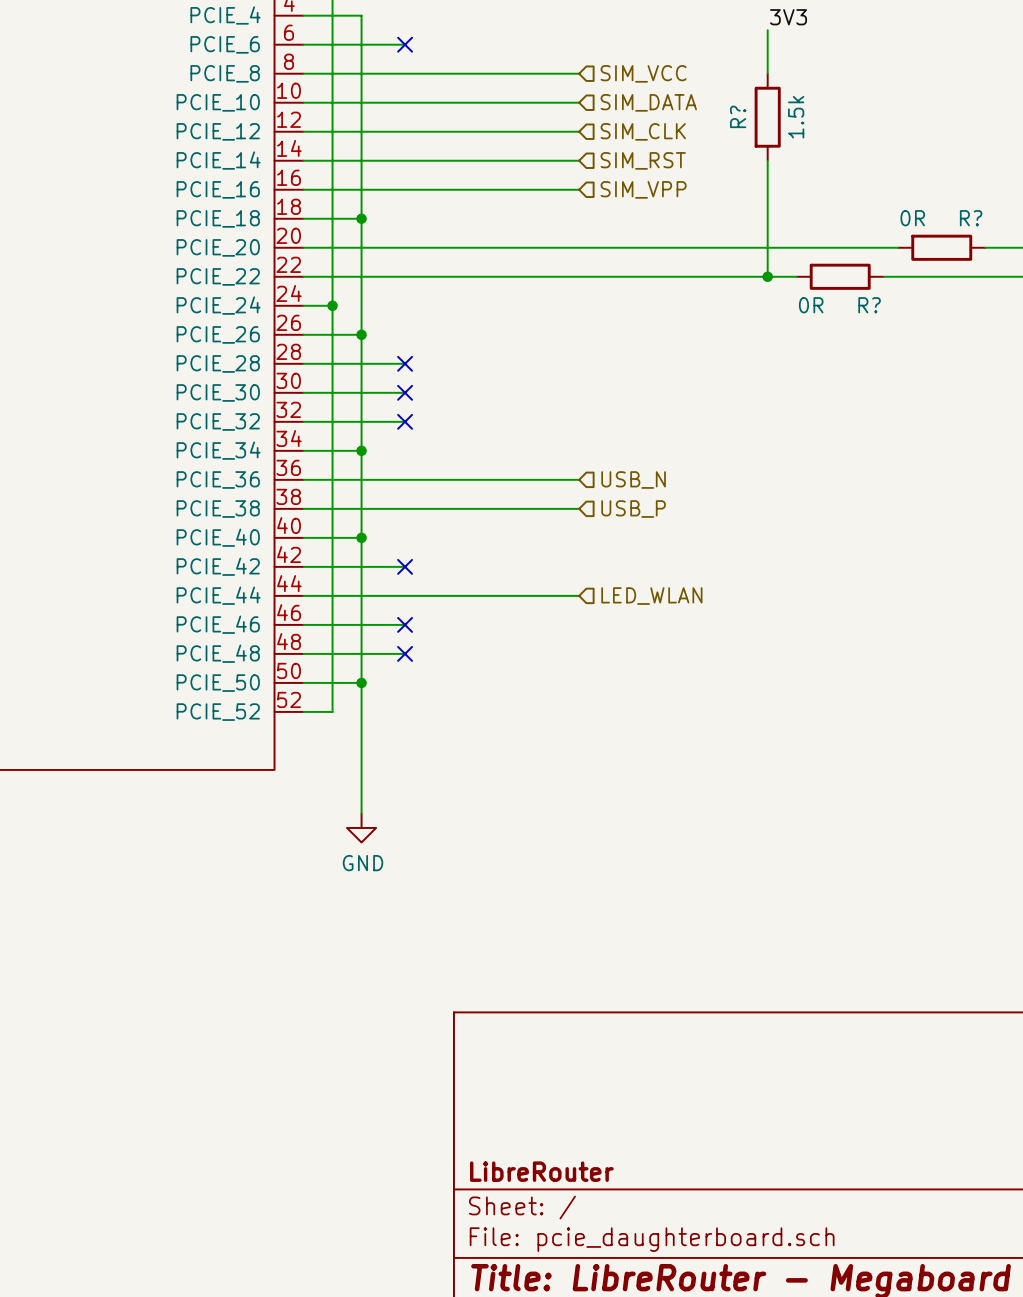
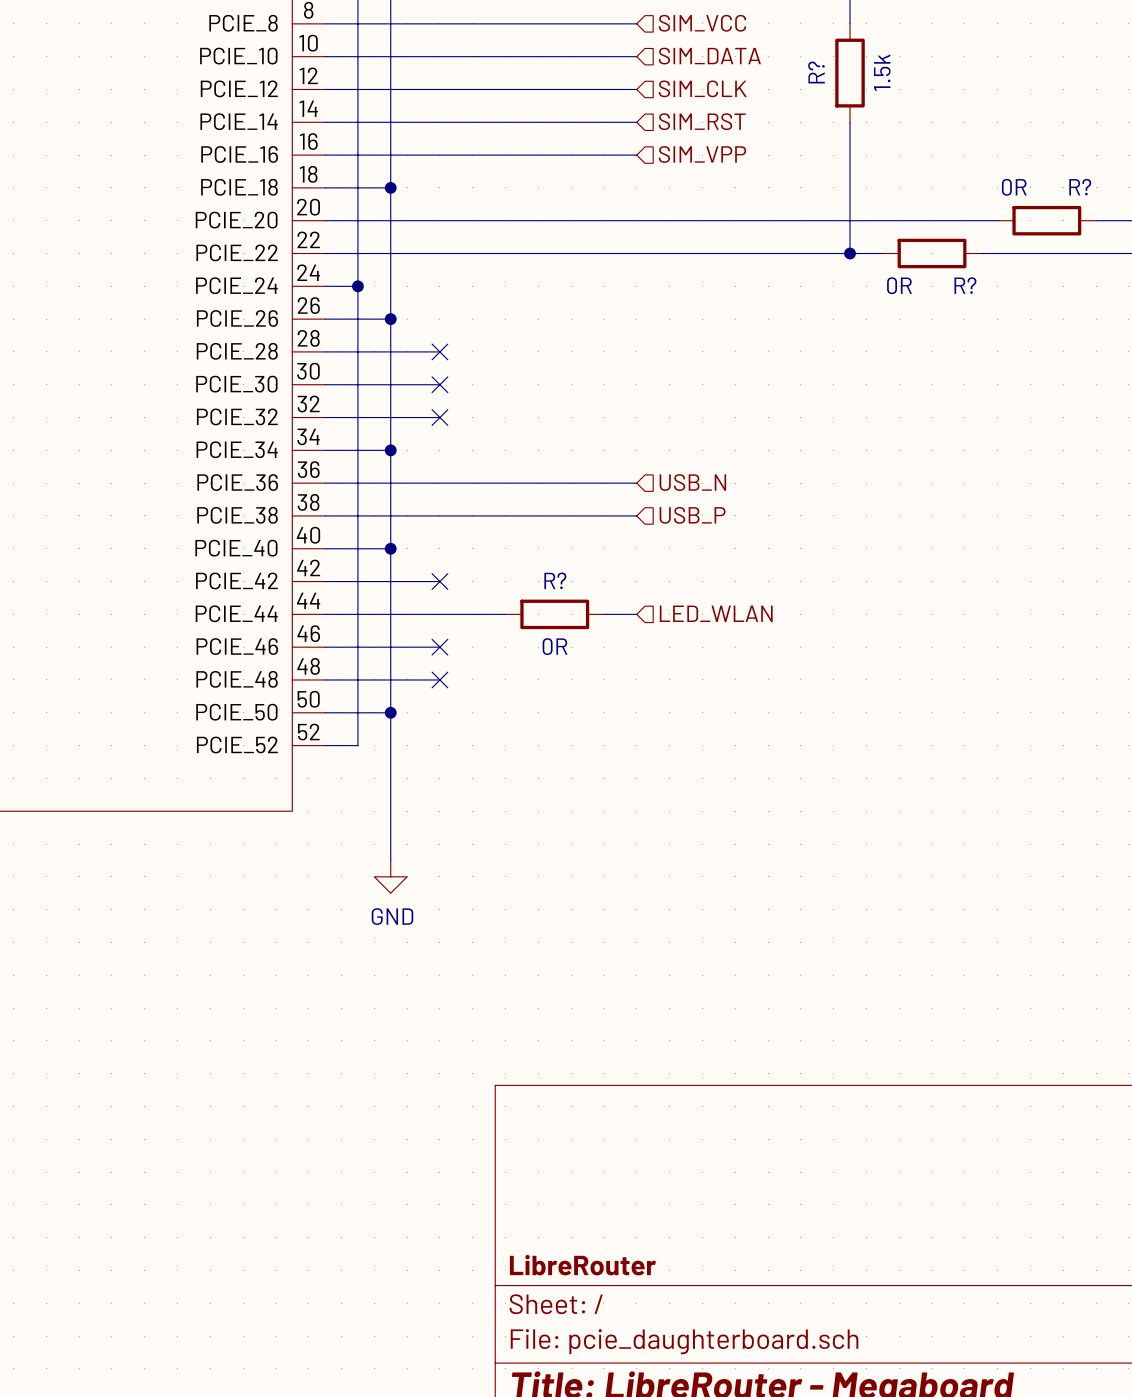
wire: (463, 595) (550, 595) -> none
R?: none -> 0R (554, 614)

